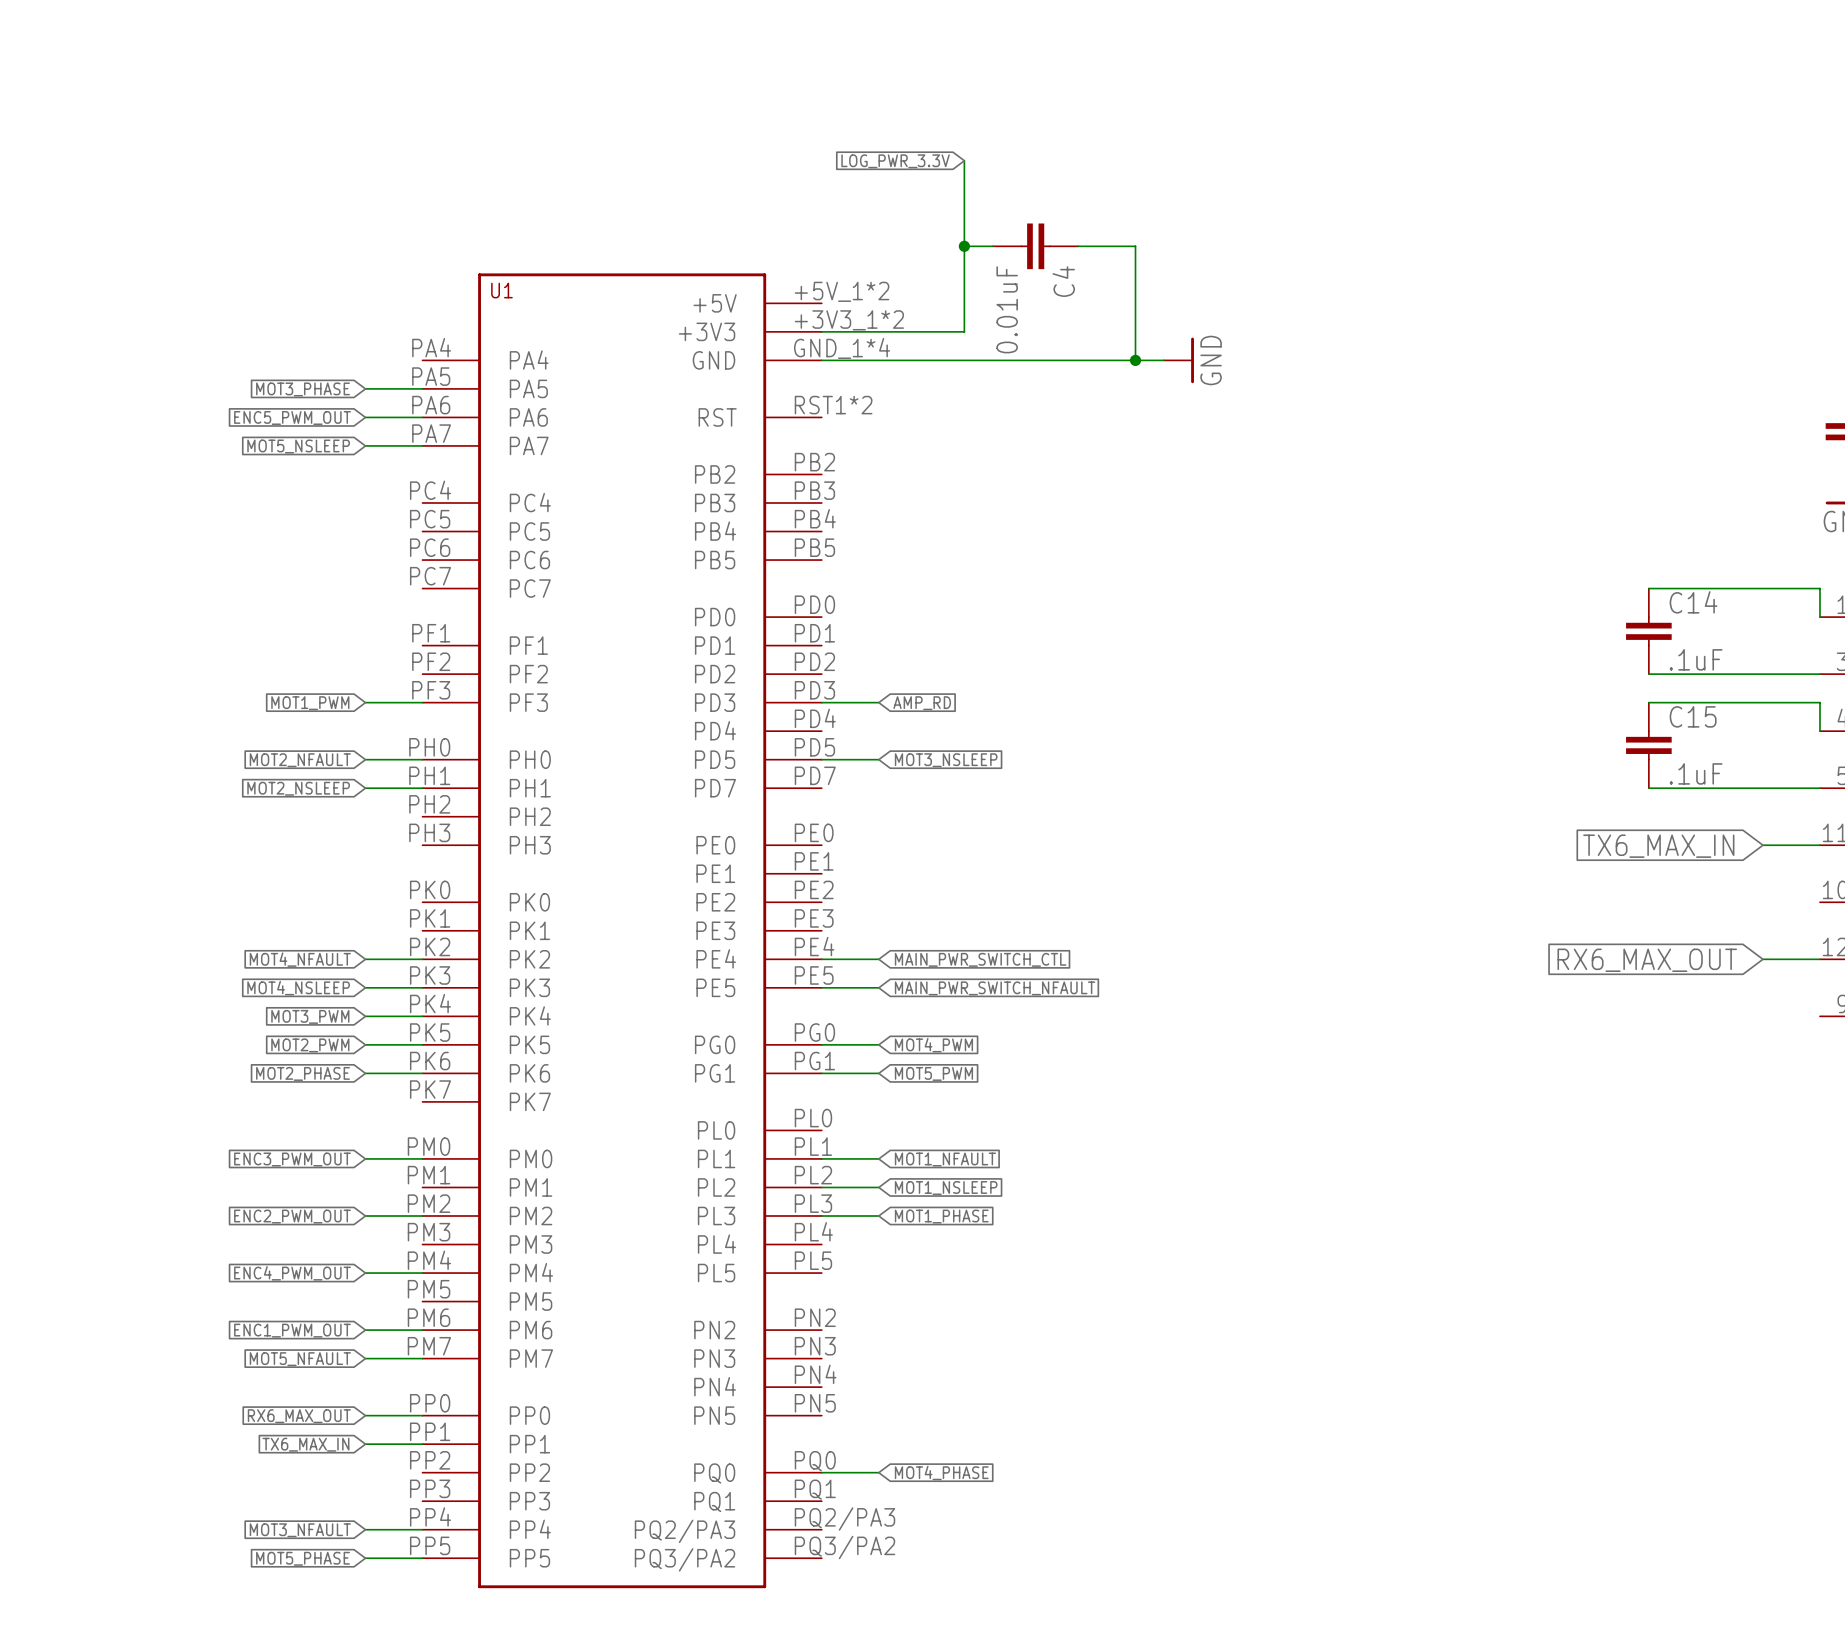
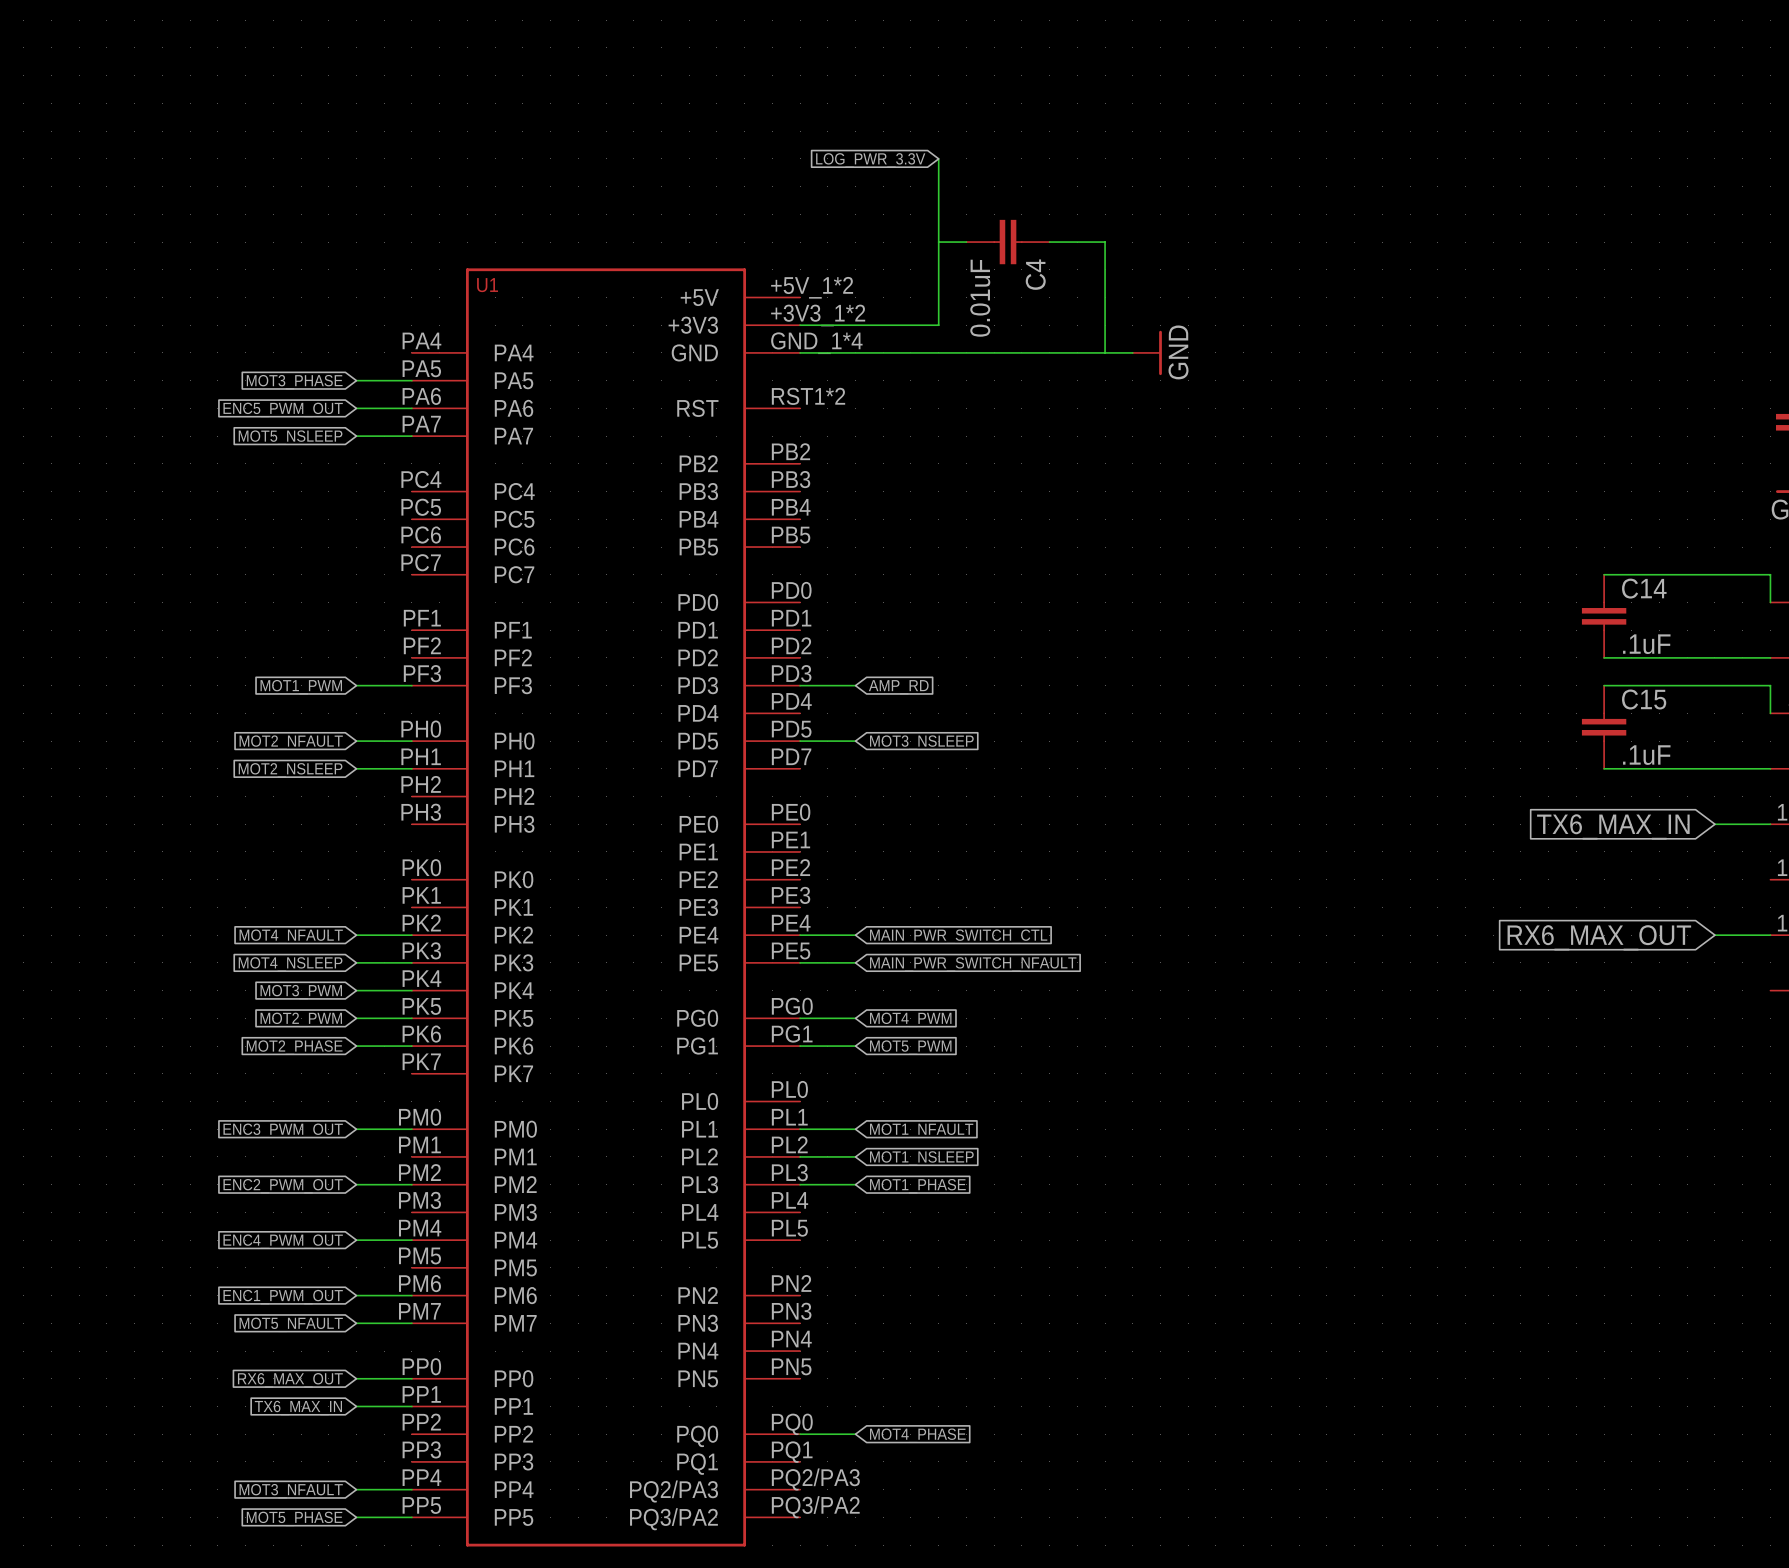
junction: (964, 246) -> none
junction: (1135, 360) -> none

